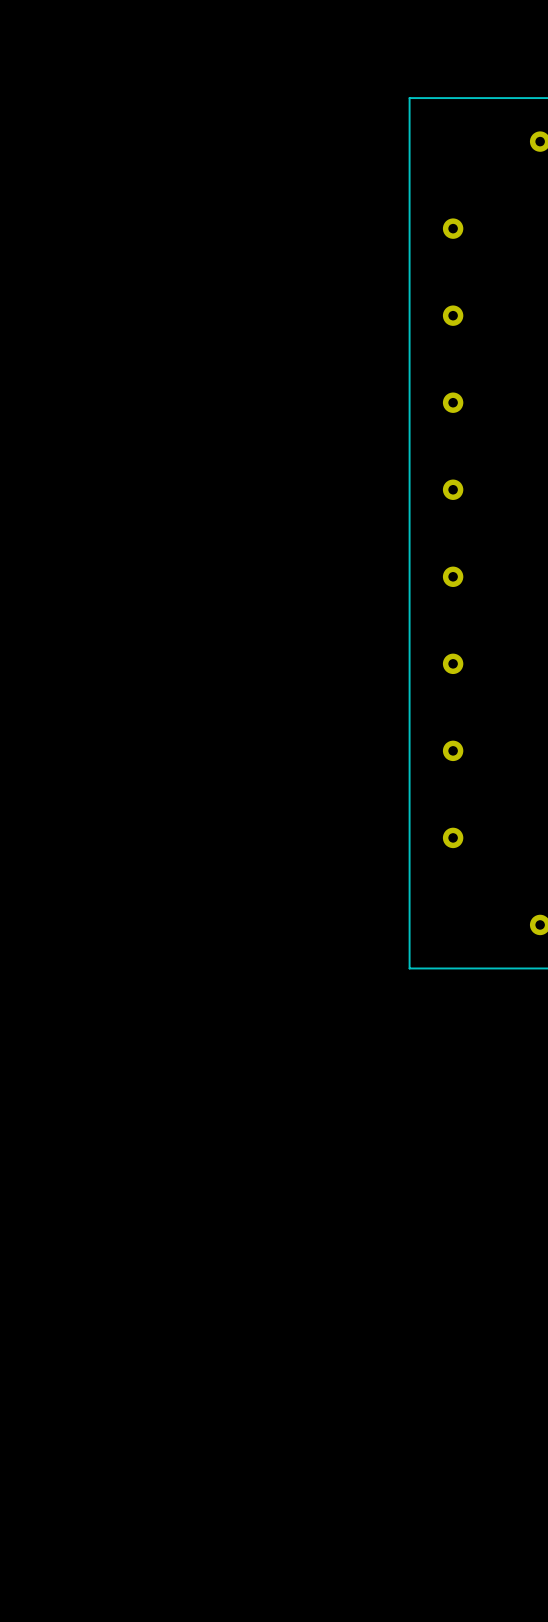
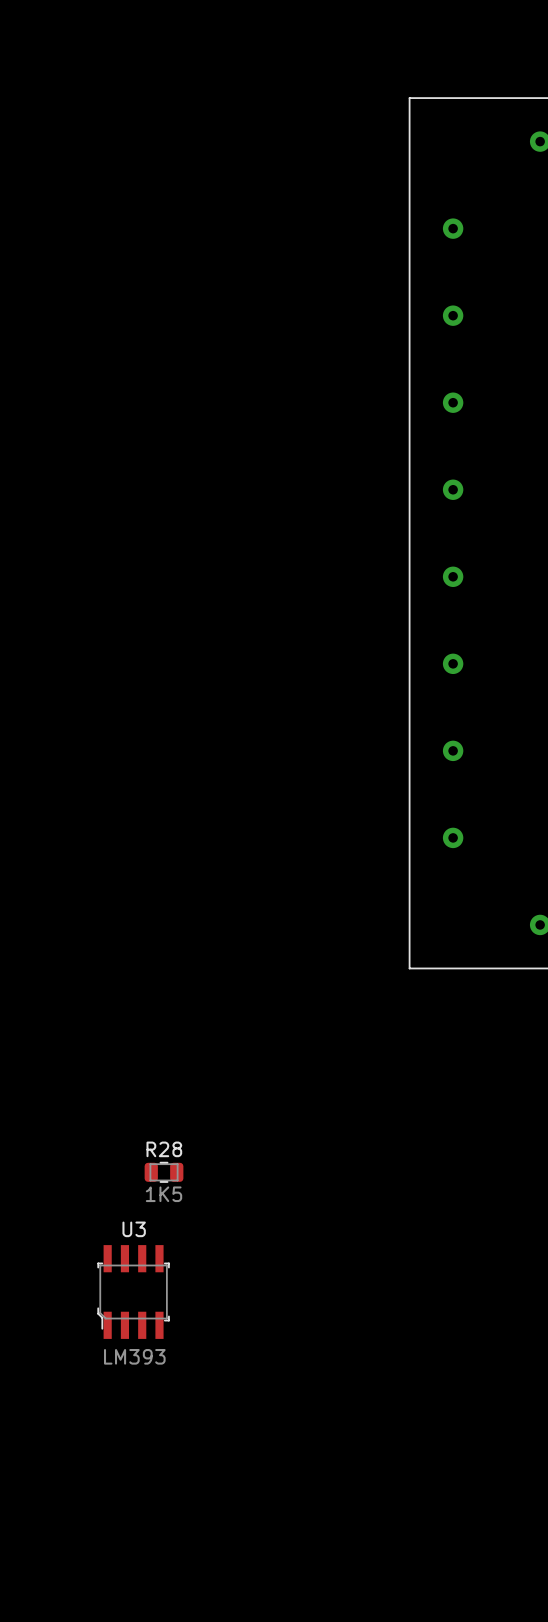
R28: none -> 1K5 (164, 1172)
U3: none -> LM393 (133, 1292)

